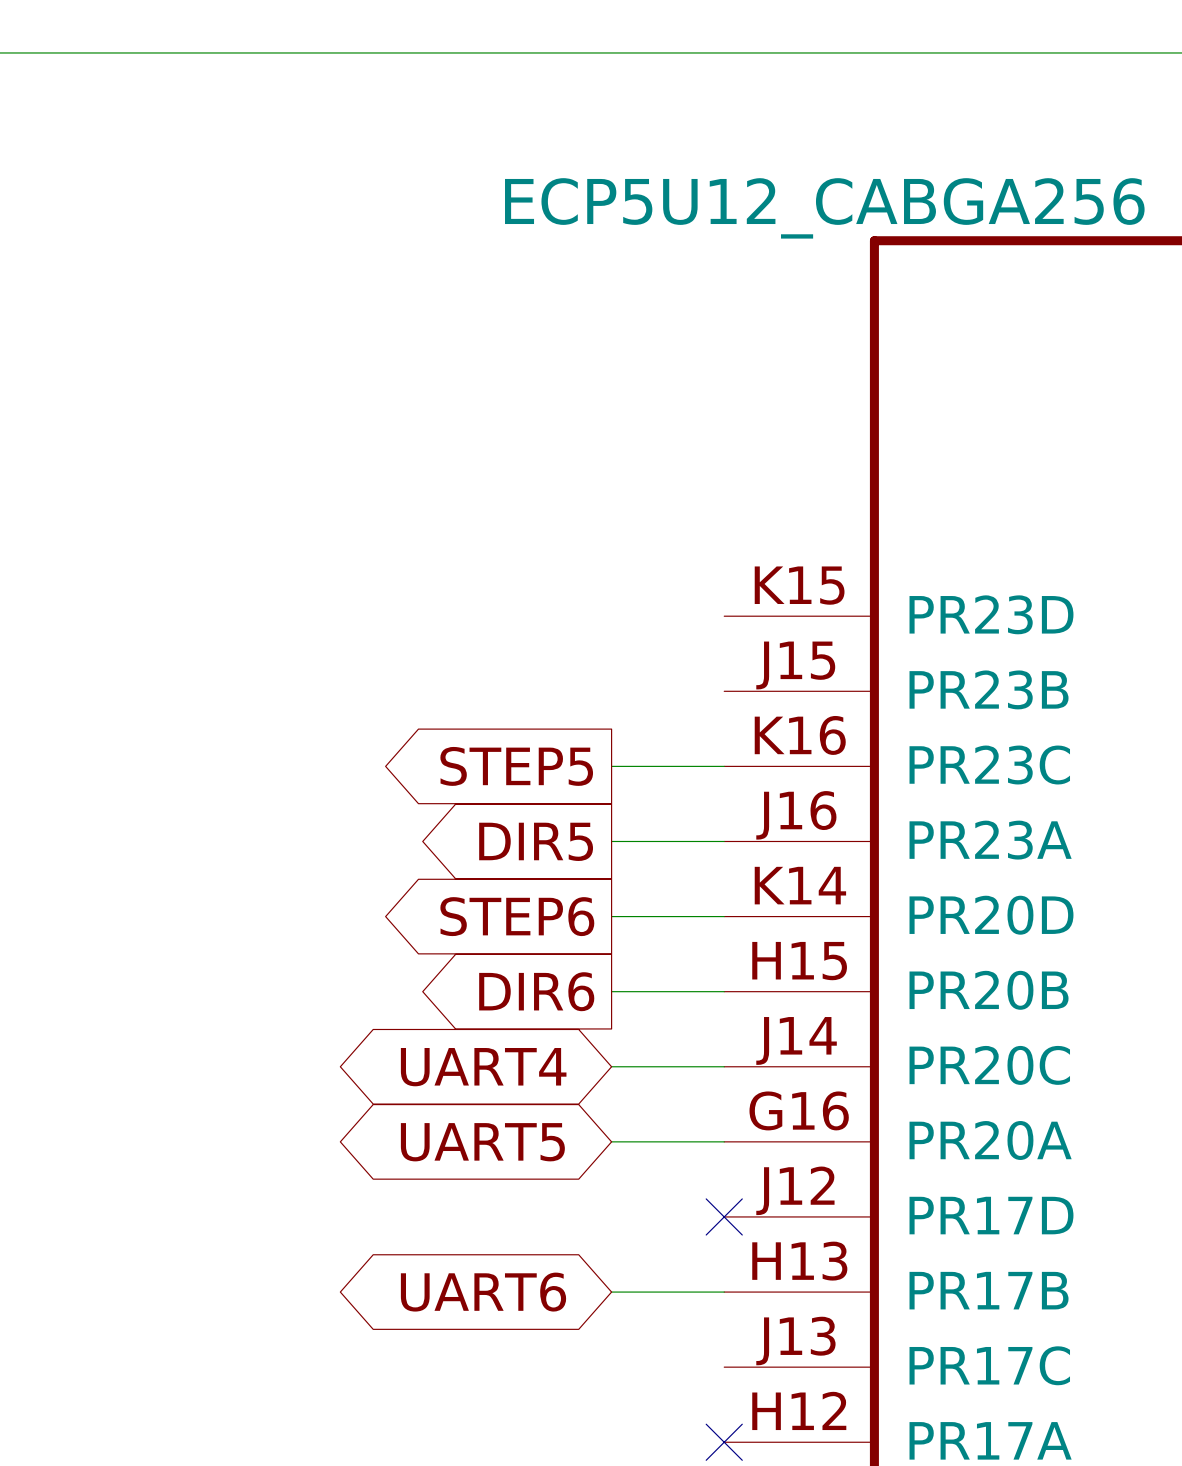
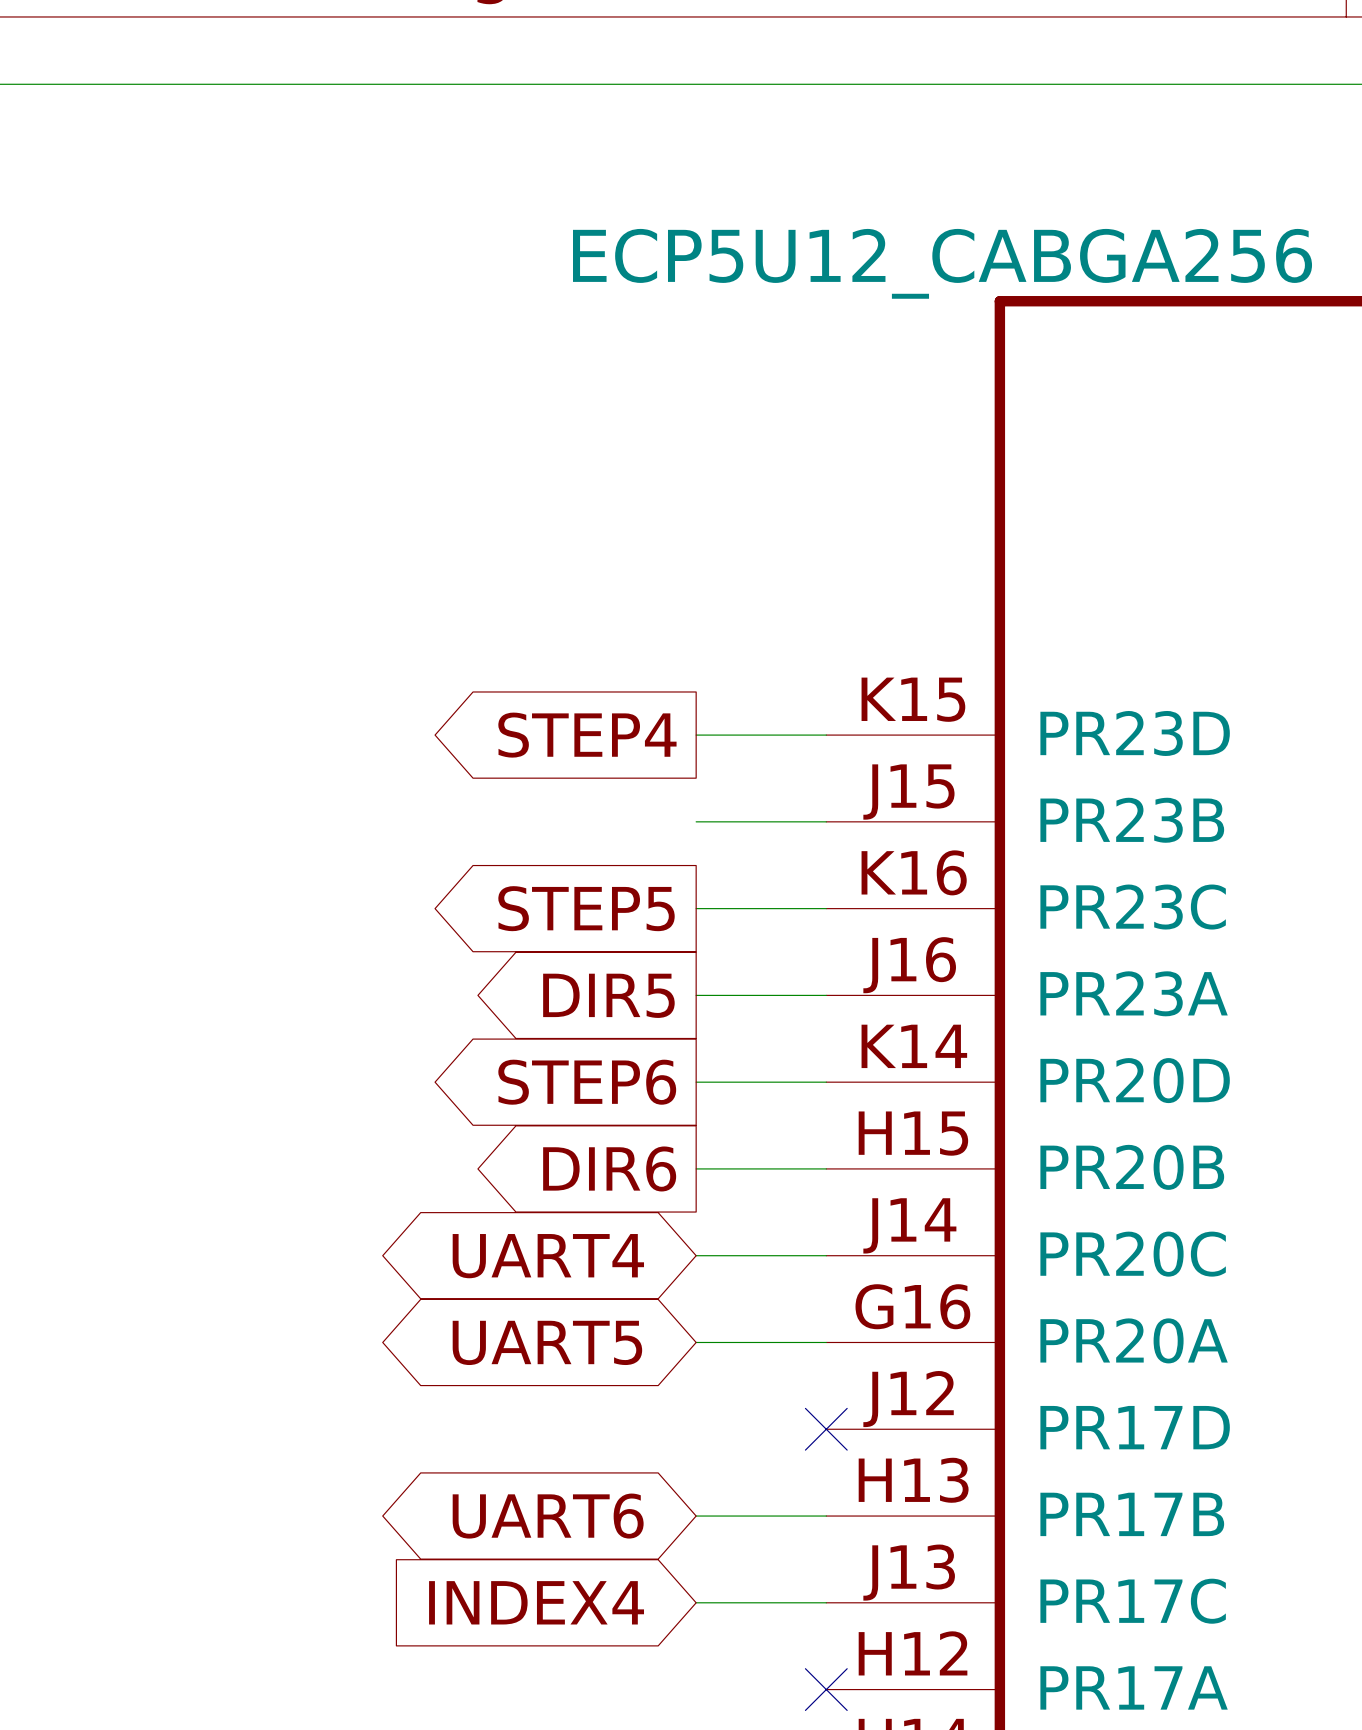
global label: none -> STEP4 (587, 735)
wire: none -> (696, 735) (826, 735)
wire: none -> (696, 821) (826, 821)
global label: none -> INDEX4 (536, 1602)
wire: none -> (696, 1602) (826, 1602)

